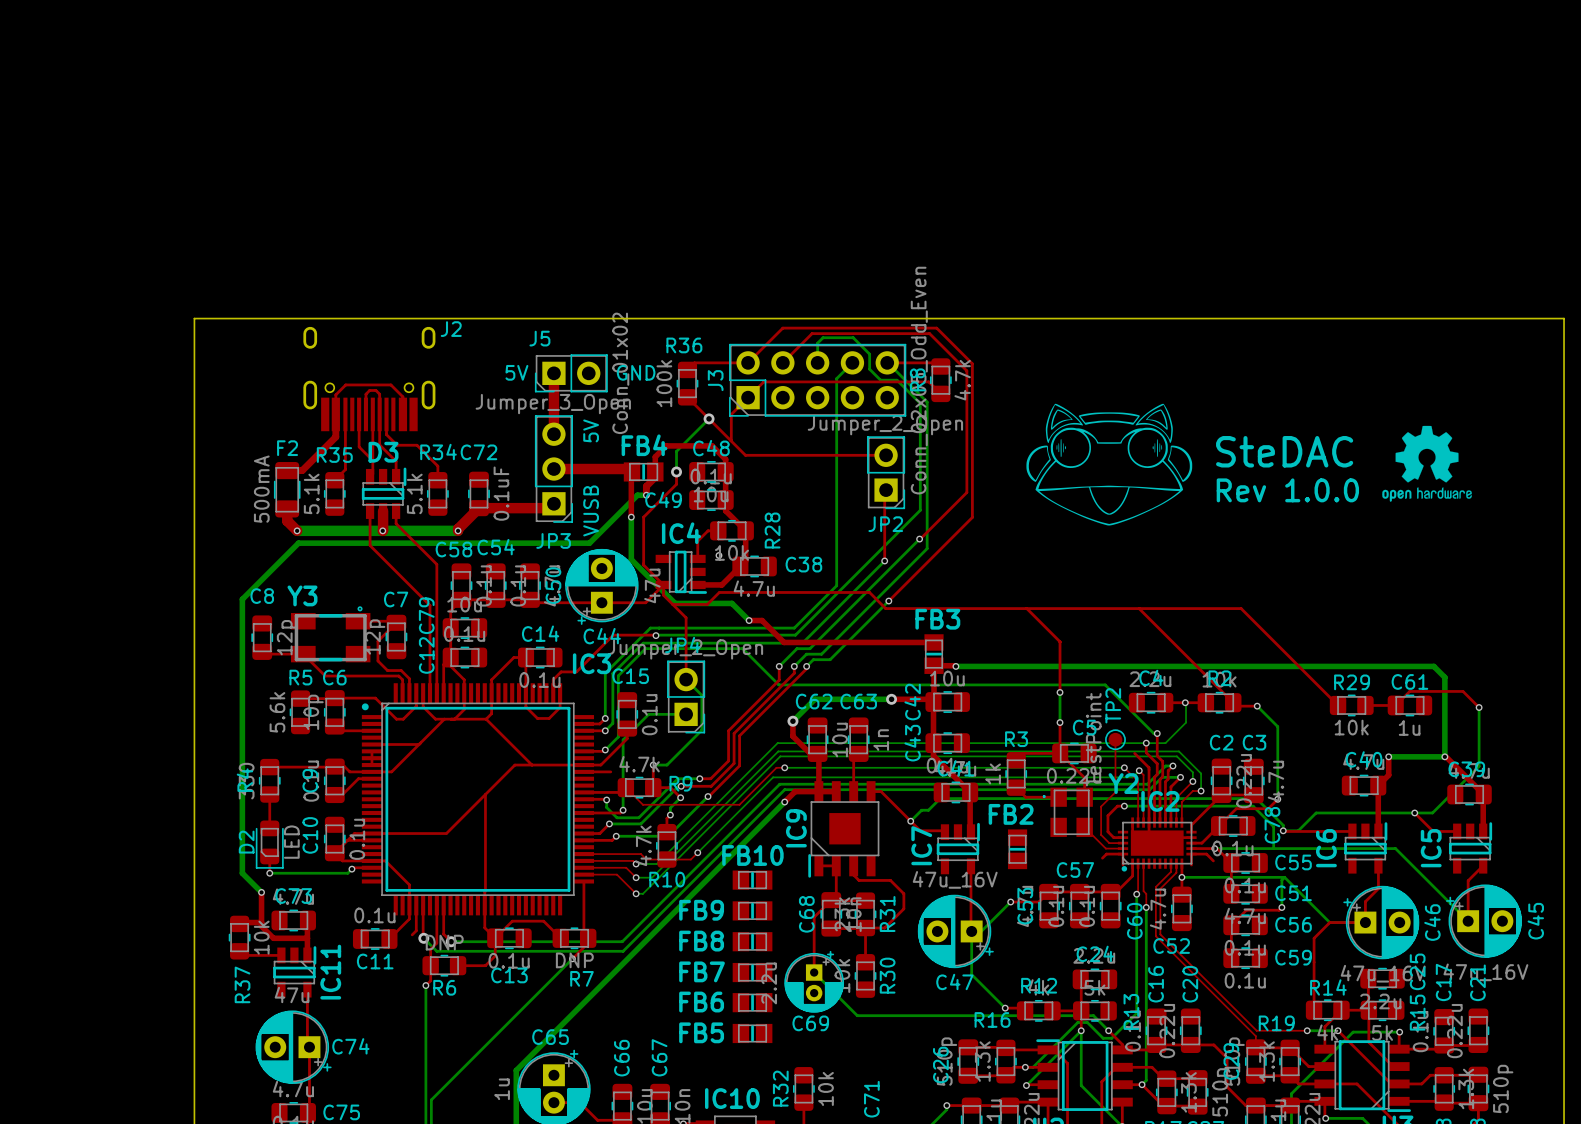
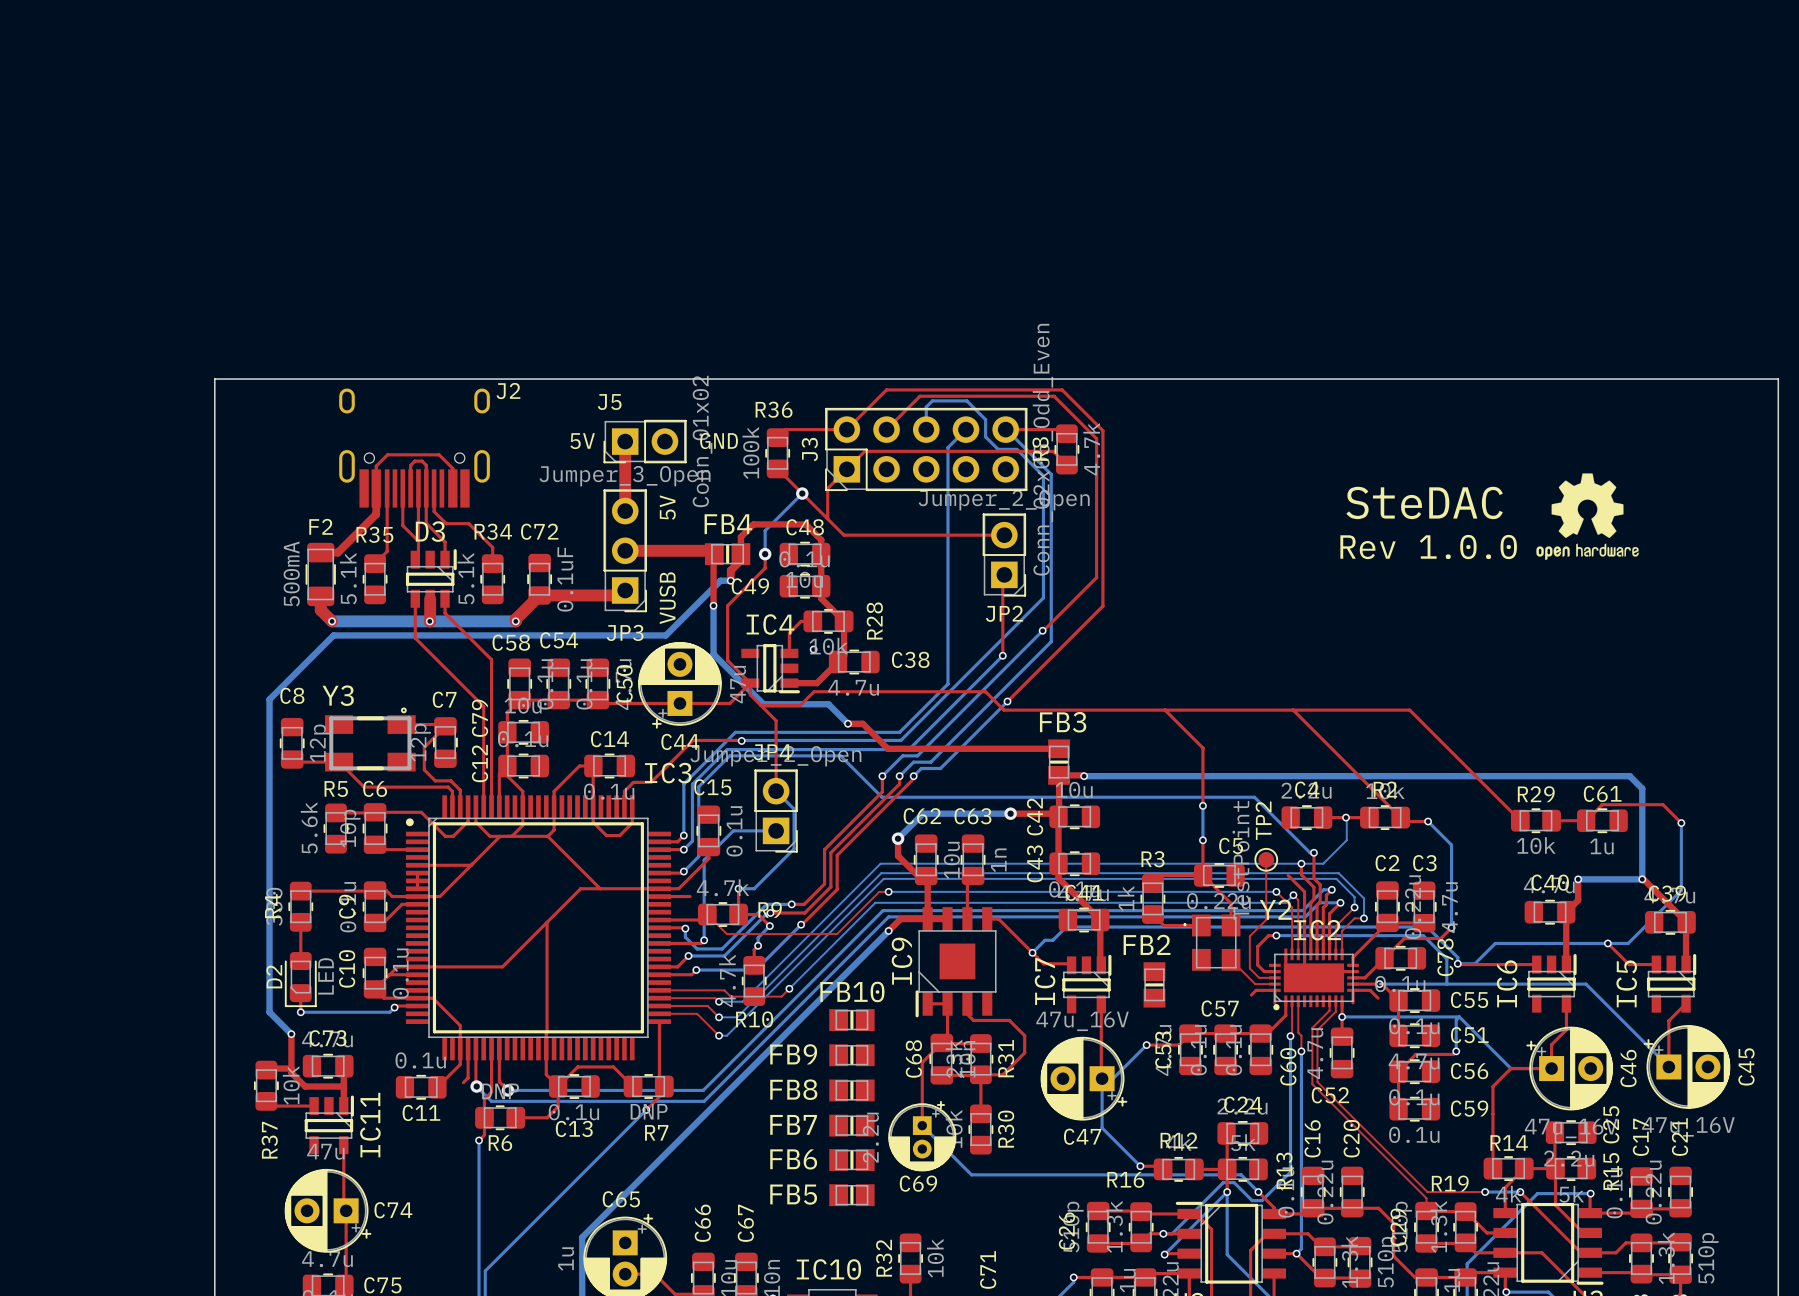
drawing: [1026, 403, 1193, 526] -> none
text position: SteDAC (1284, 451) -> SteDAC (1424, 502)
drawing position: (1427, 463) -> (1587, 516)
text position: Rev 1.0.0 (1287, 490) -> Rev 1.0.0 (1428, 547)

